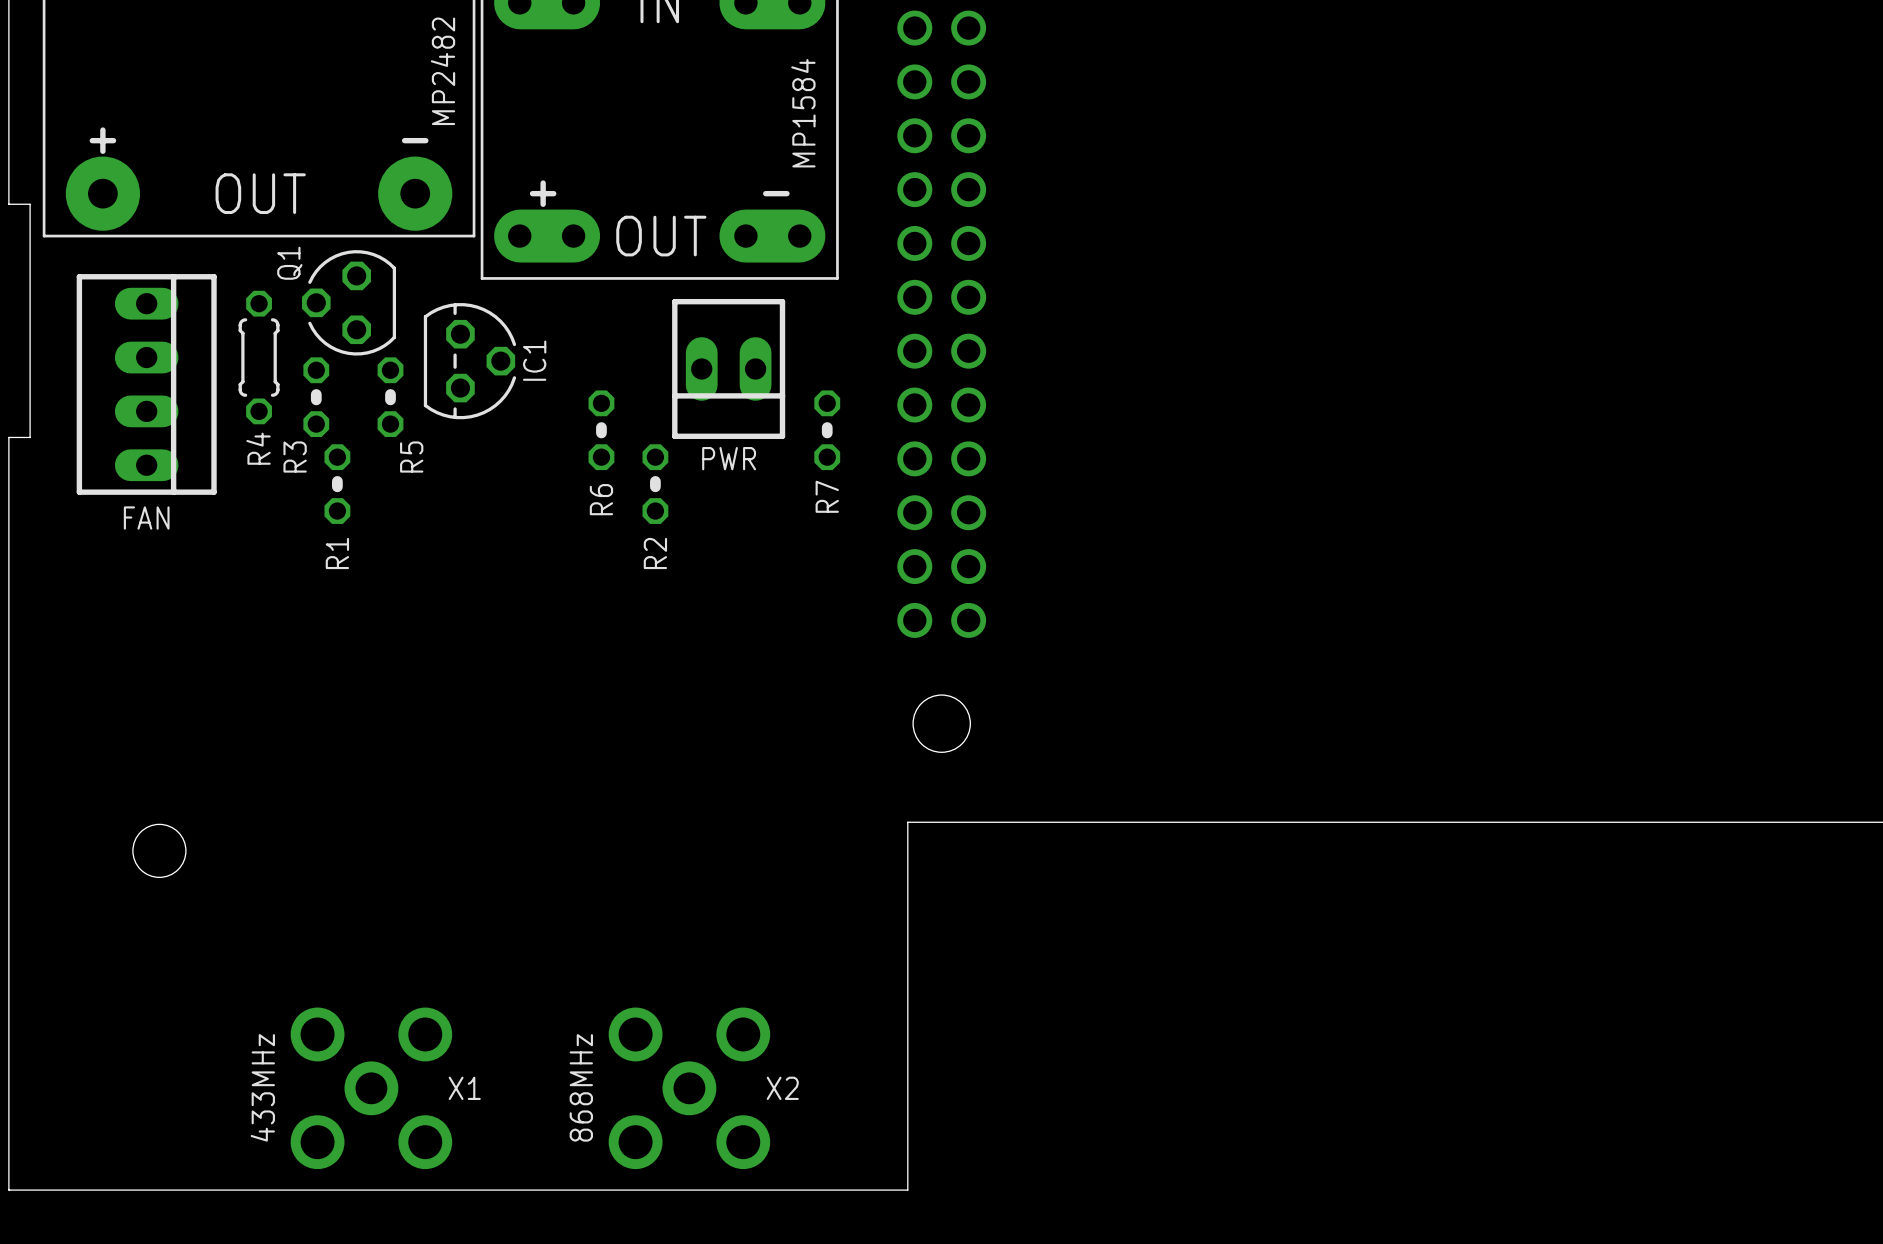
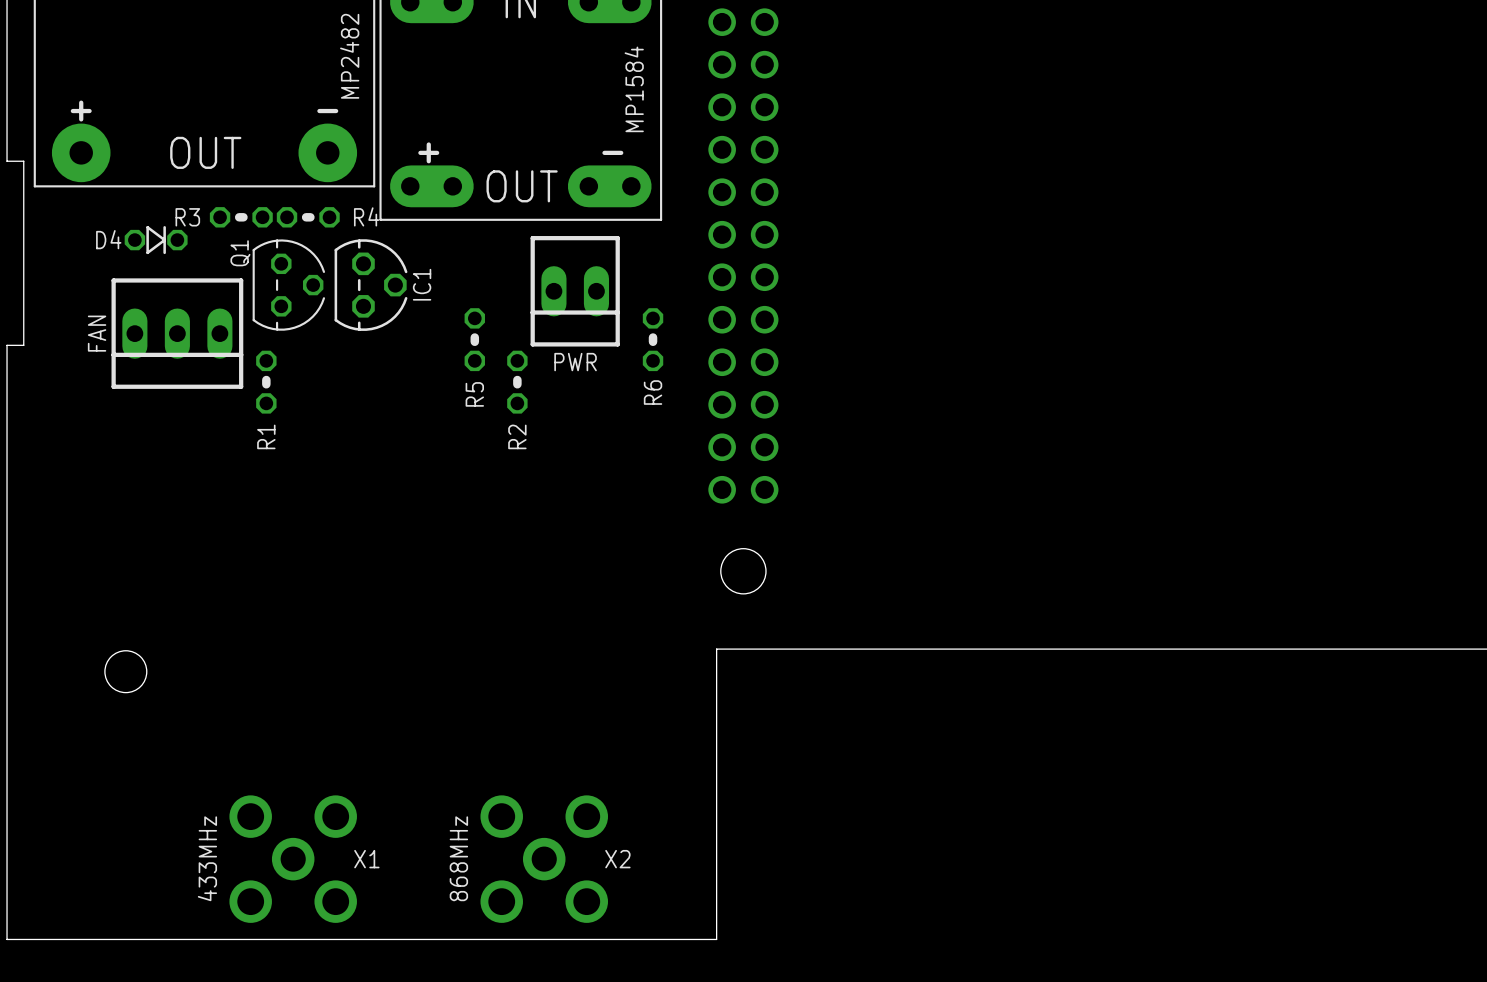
Q1 footprint: [301, 250, 397, 356] -> [252, 239, 326, 331]
R4 footprint: [238, 290, 280, 425] -> [276, 207, 340, 228]
D4: none -> (156, 240)
FAN: (146, 384) -> none
R3 rotation: 0° (316, 397) -> 90° clockwise (241, 217)
R3 position: (316, 397) -> (241, 217)
R5: (390, 397) -> none
FAN: none -> (177, 333)
R4 name position: R4 (258, 448) -> R4 (366, 216)
R7 name: R7 (827, 496) -> R6 (653, 392)
R6 name: R6 (601, 499) -> R5 (474, 394)

